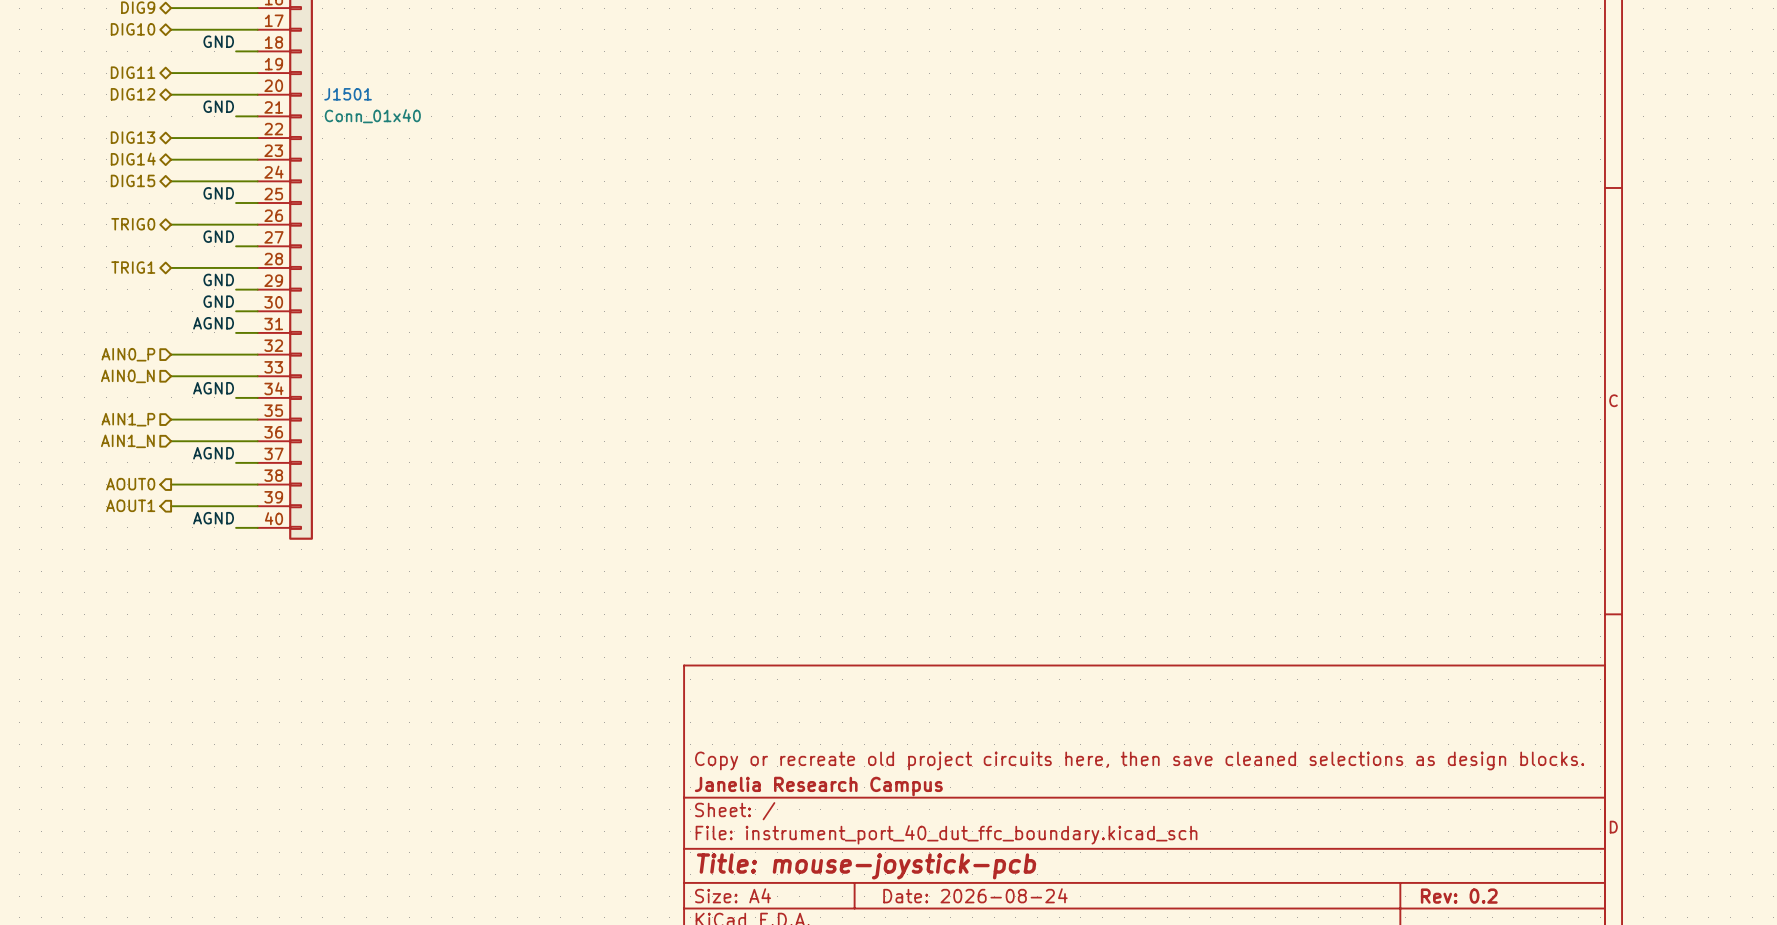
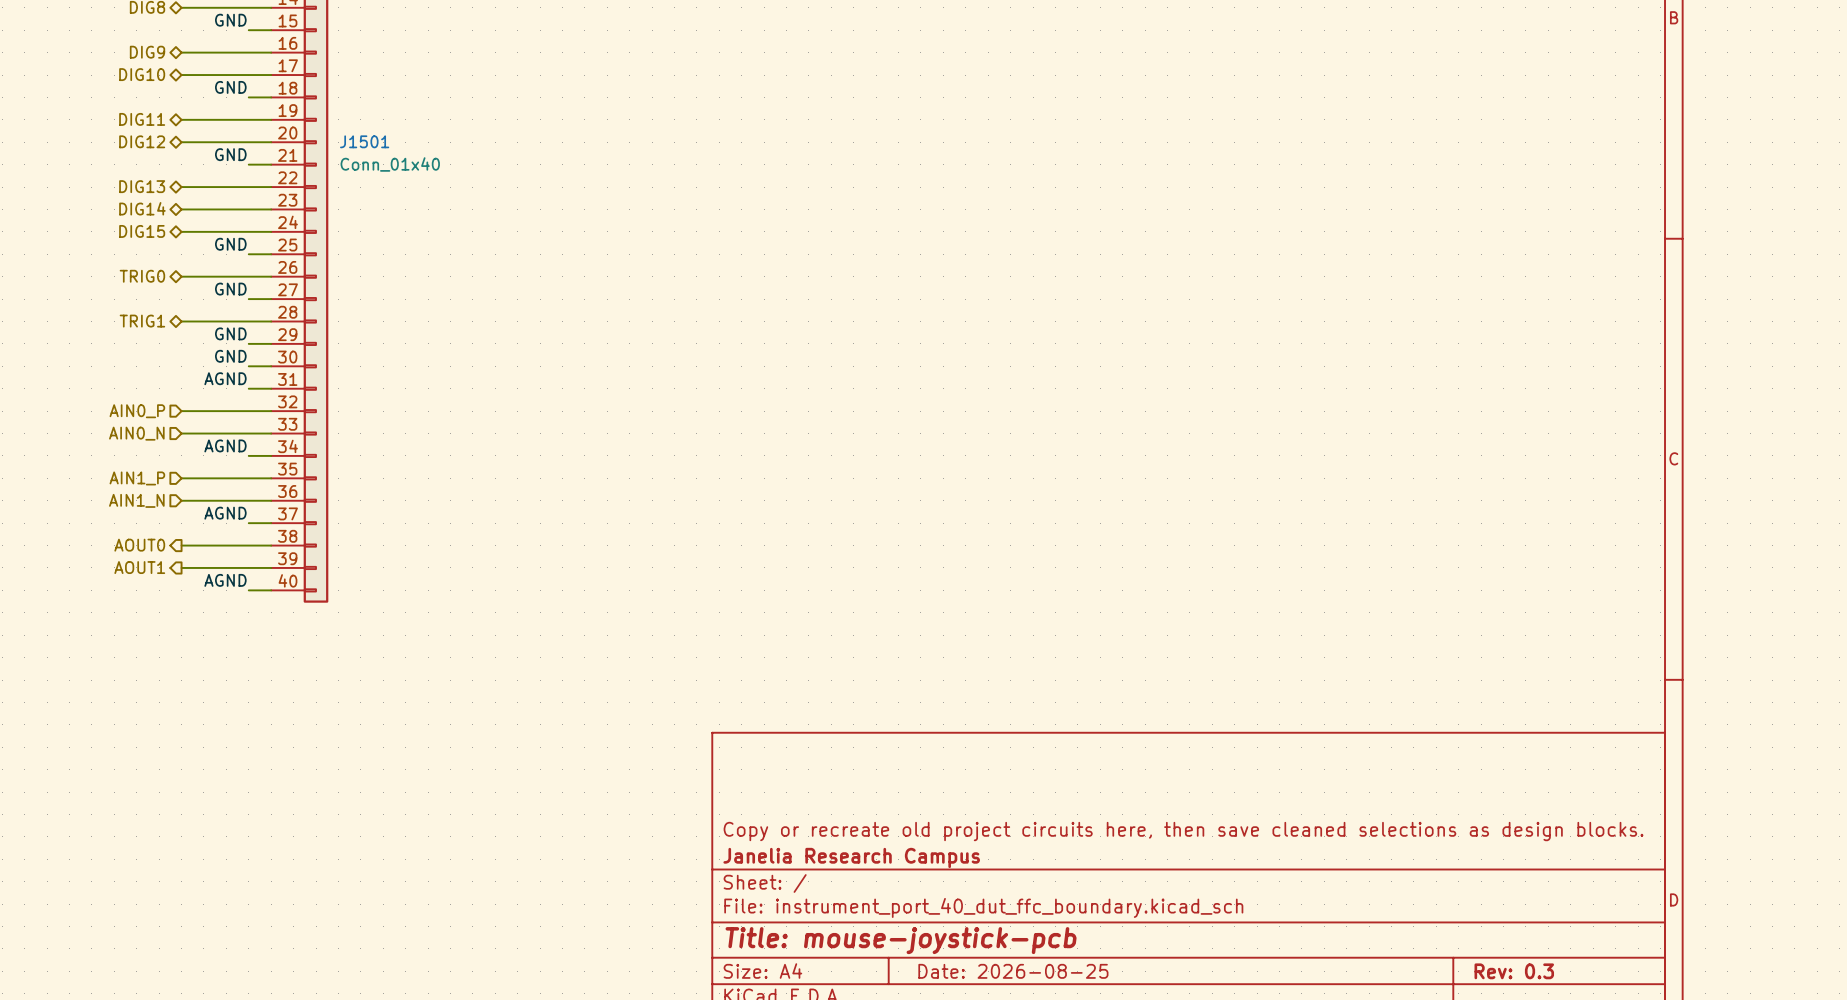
title block: Date: 2026-08-24 (975, 895) -> Date: 2026-08-25 (1013, 971)
title block: Rev: 0.2 (1459, 896) -> Rev: 0.3 (1514, 971)

